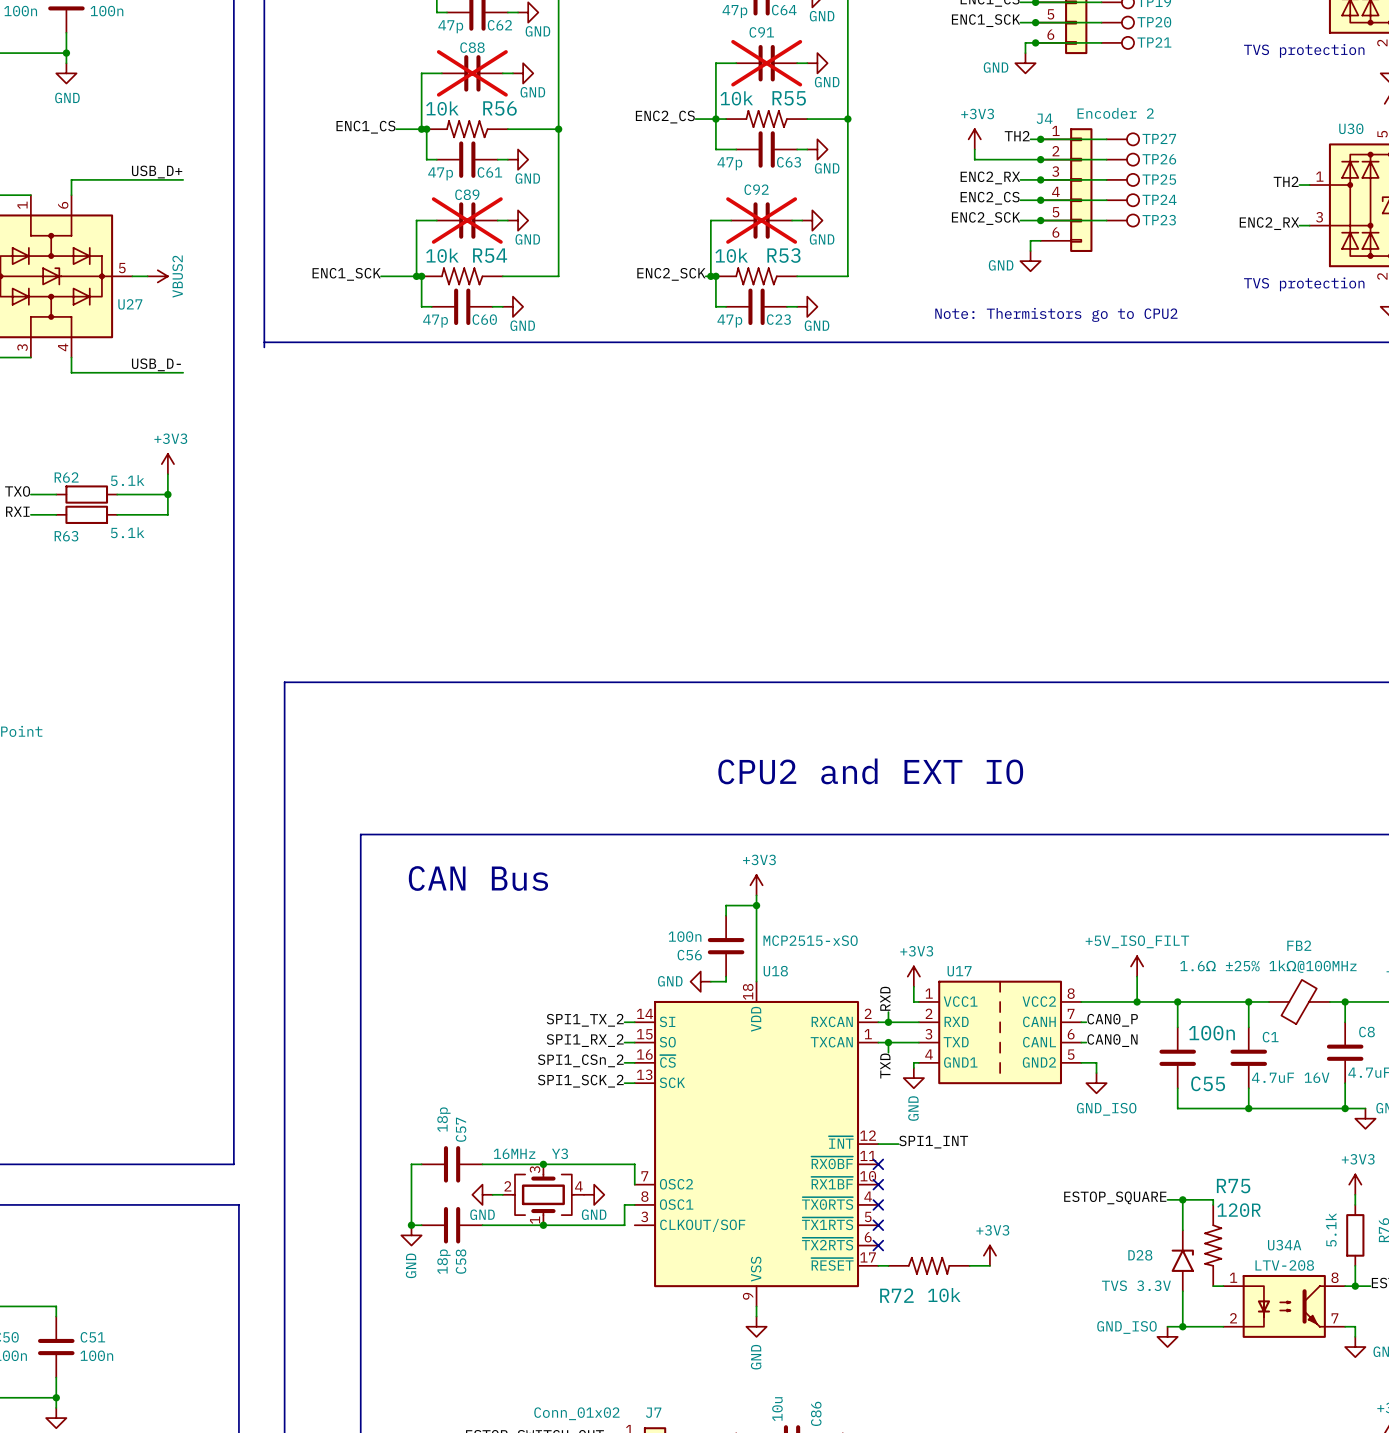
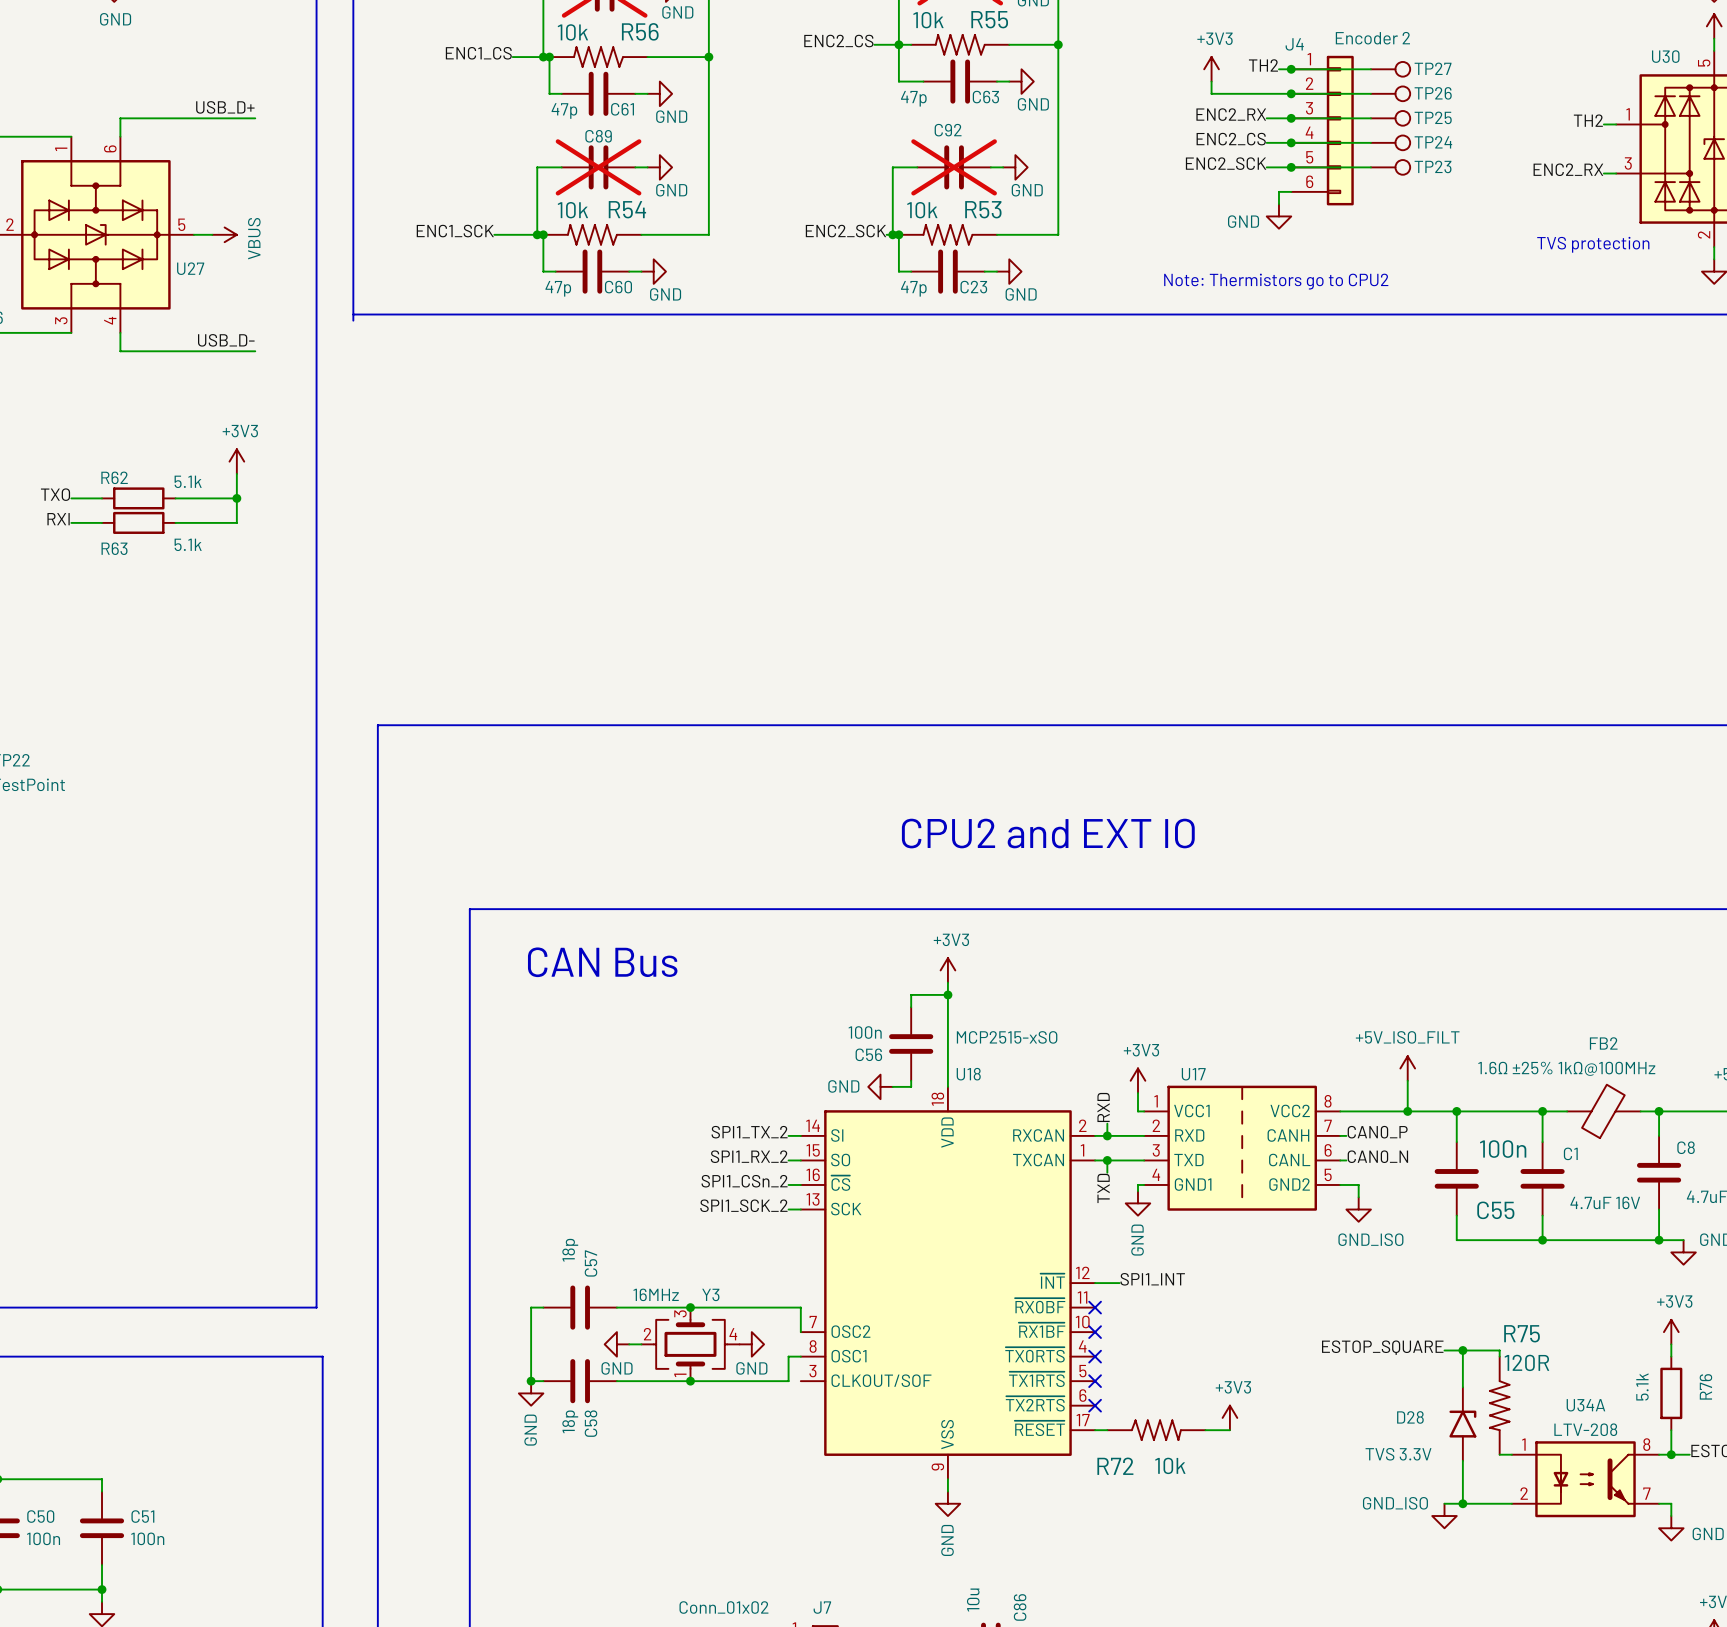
power symbol: VBUS2 (157, 276) -> VBUS (224, 234)

